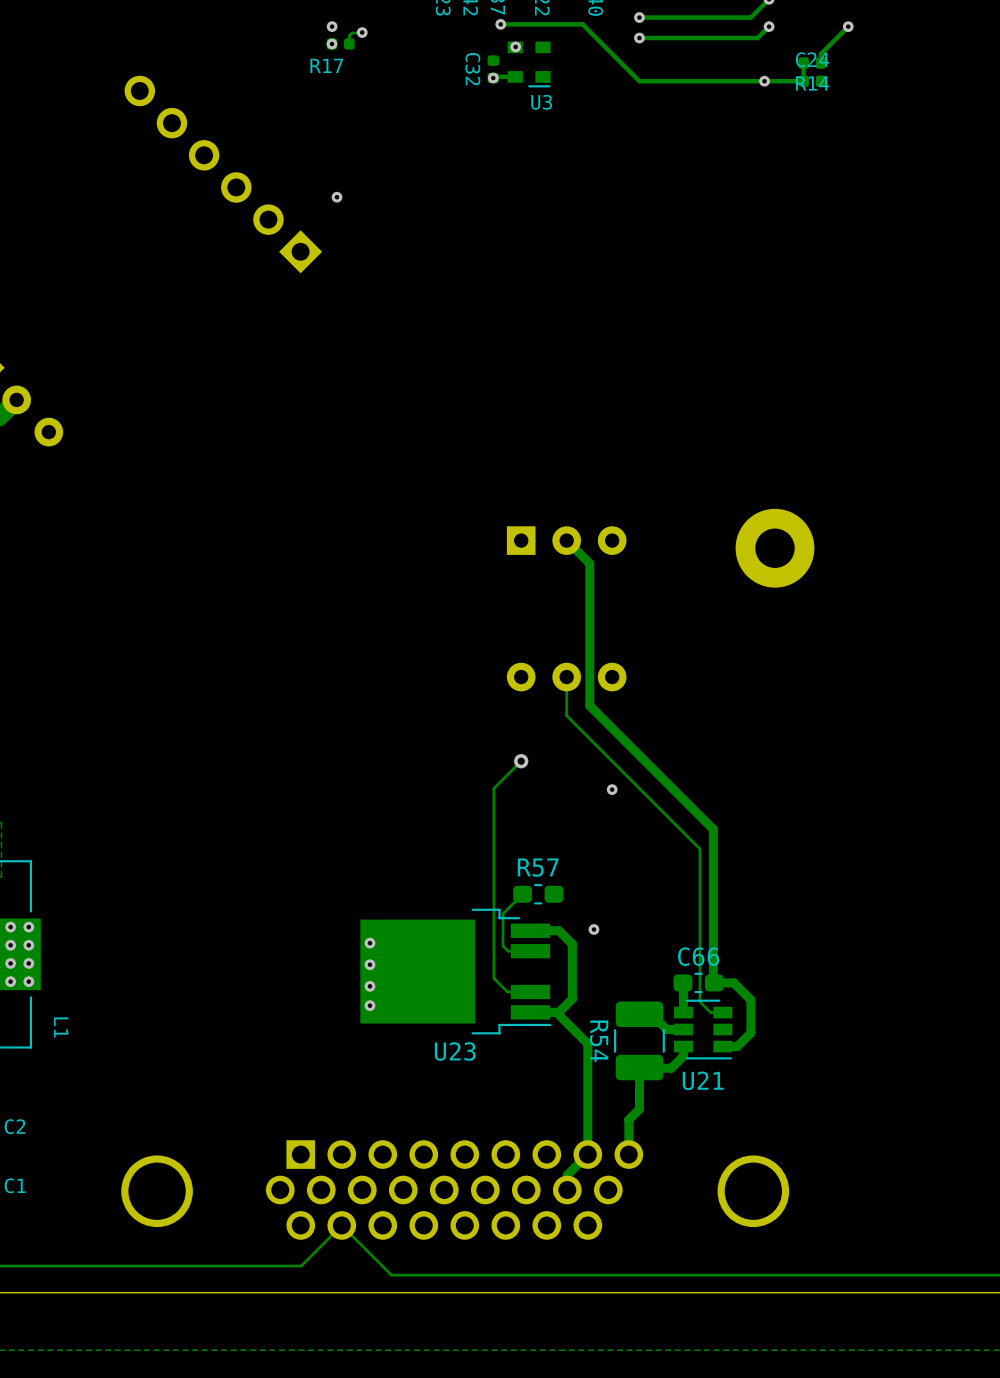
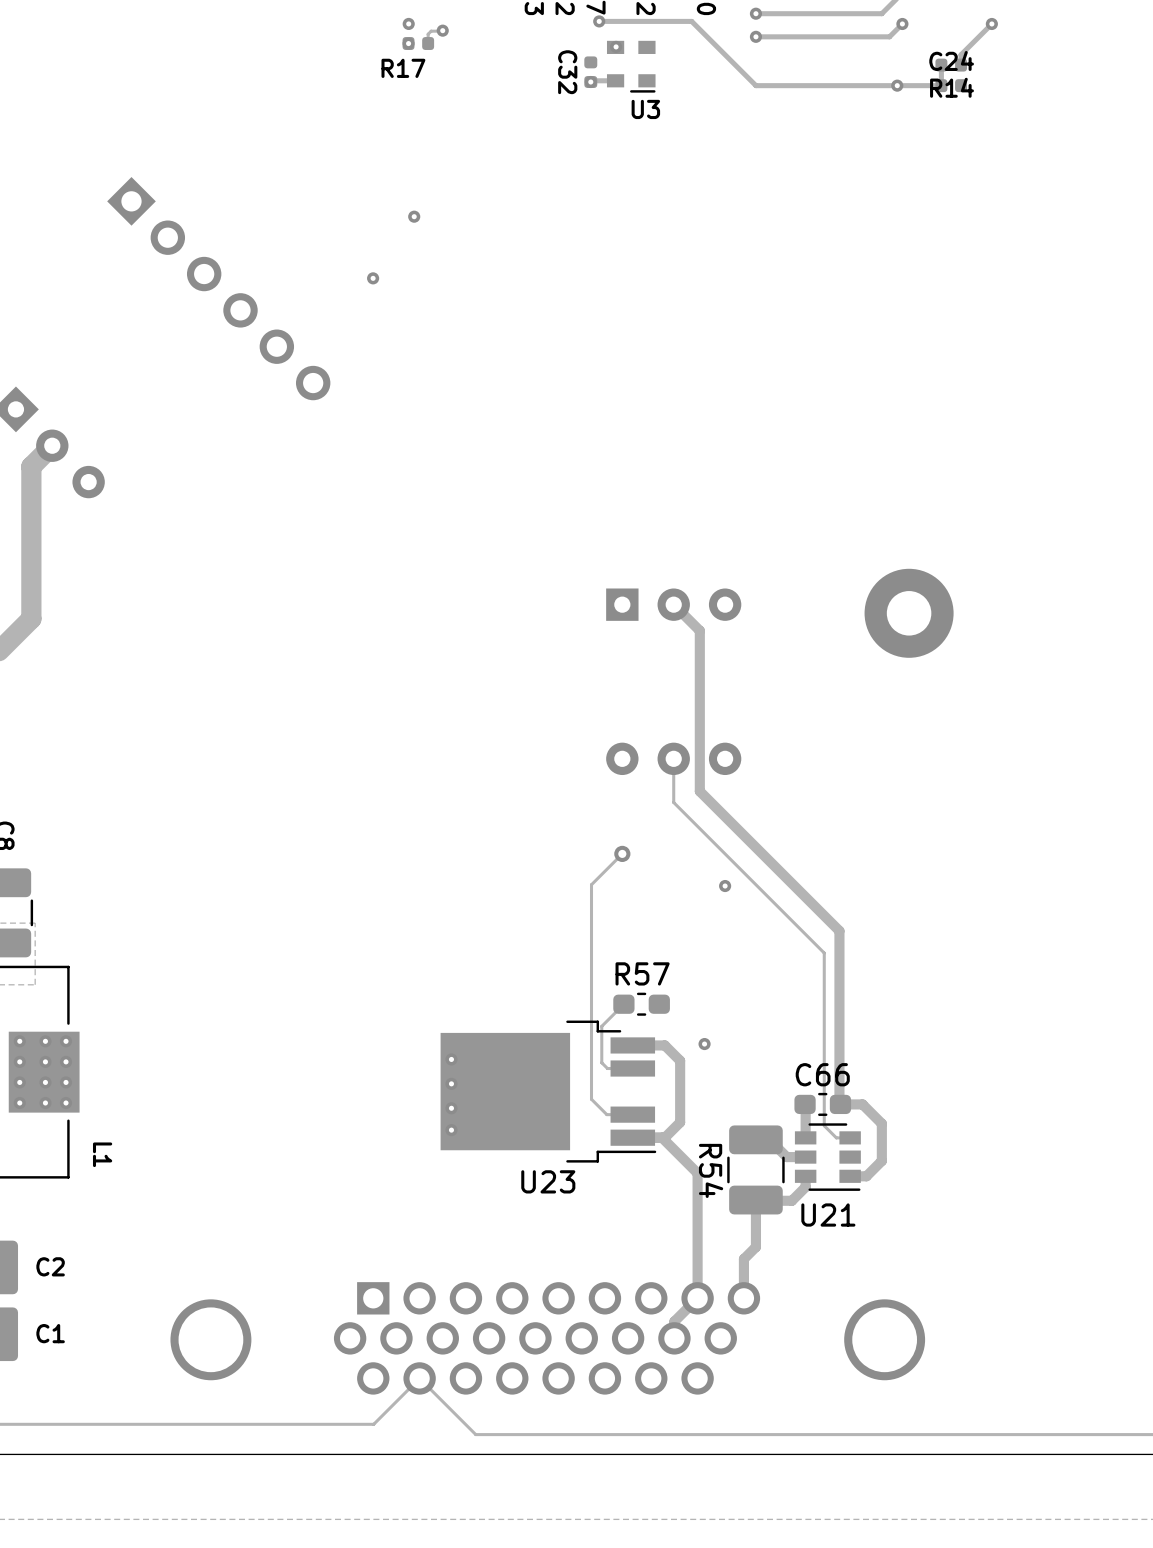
part rotation: 0° (223, 174) -> 180° (218, 288)
via: none -> (373, 278)

